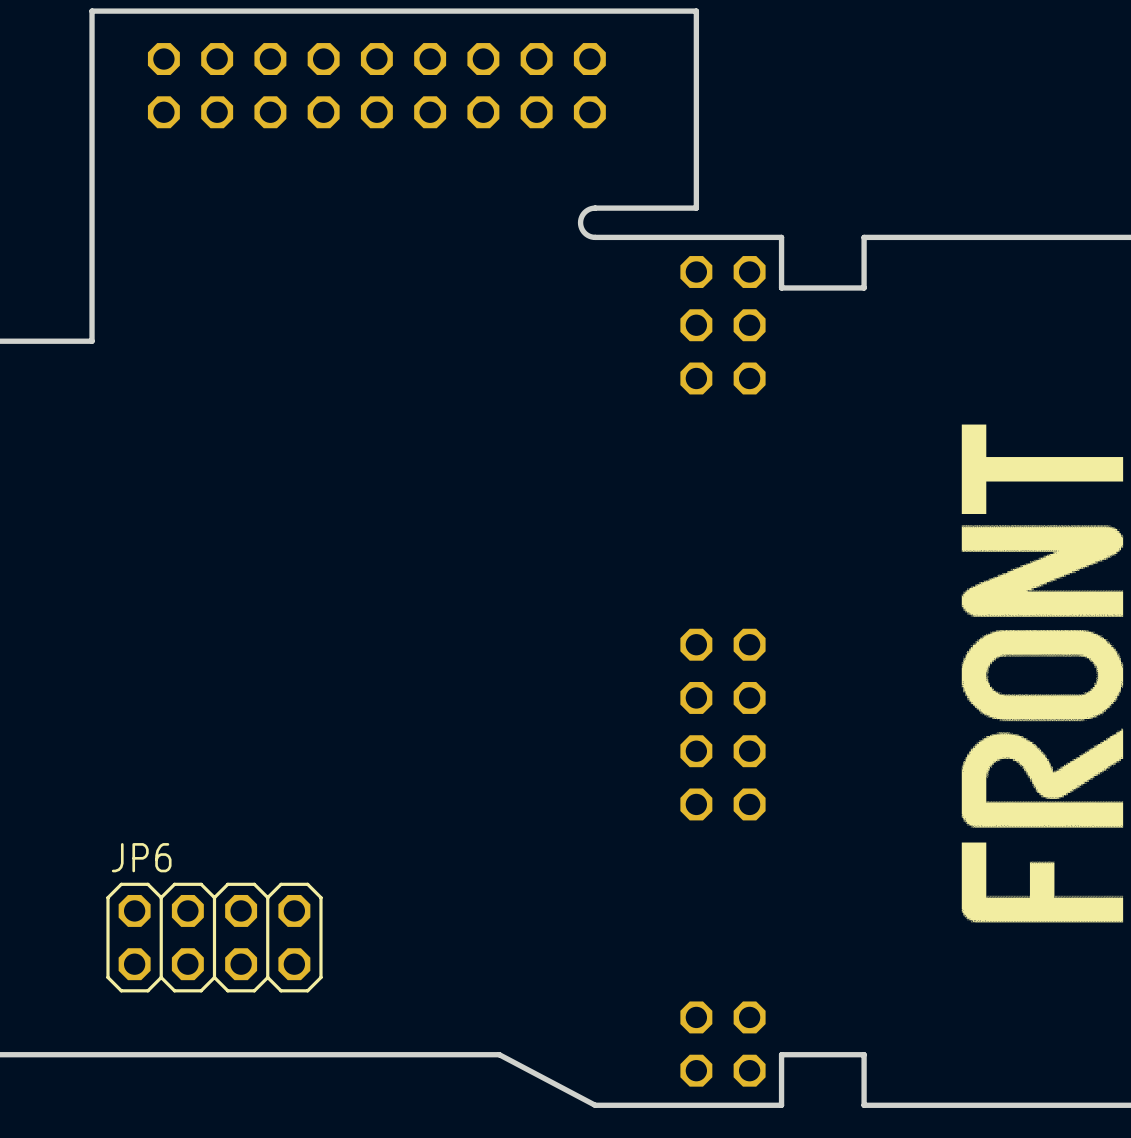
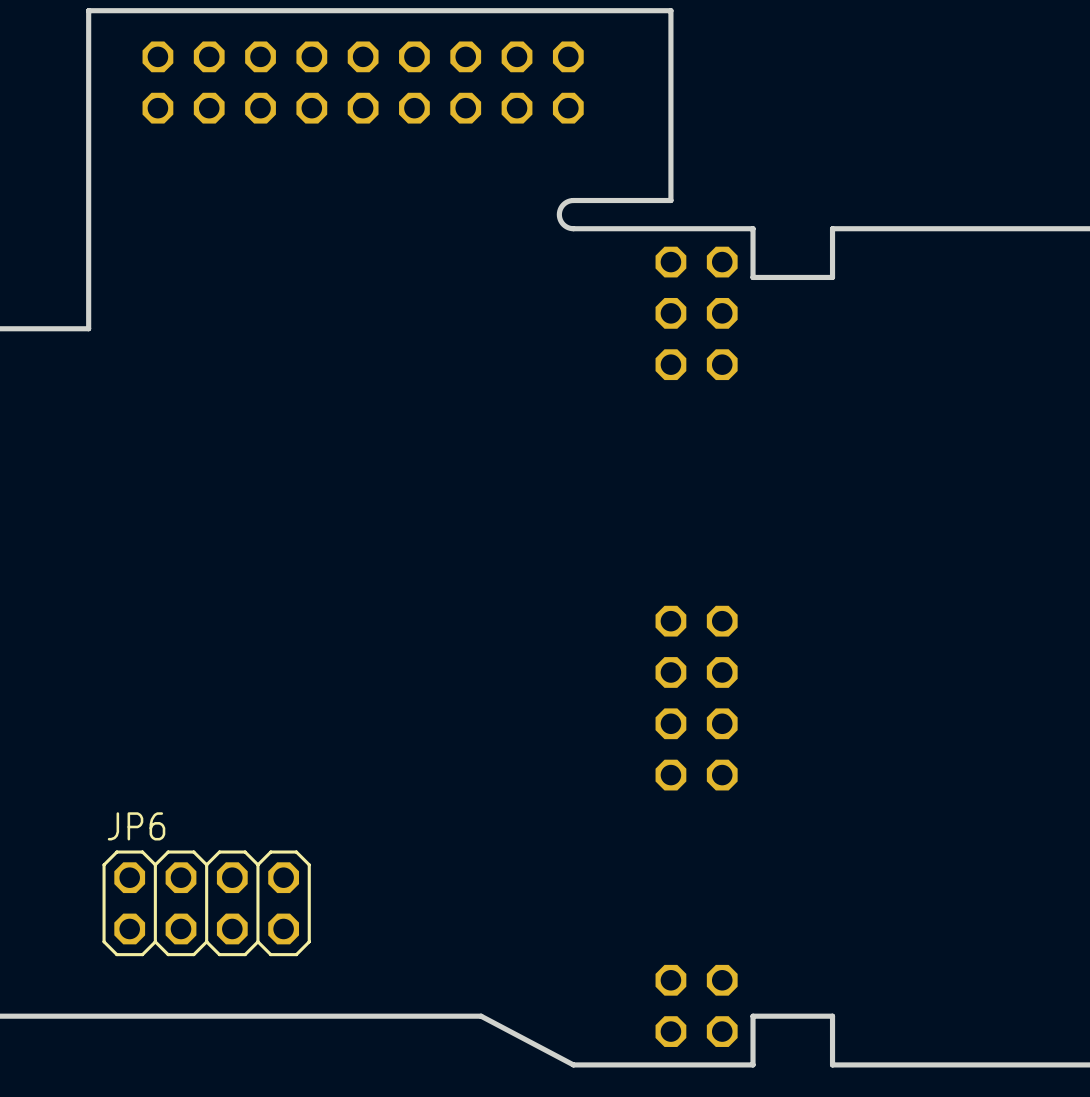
drawing: [961, 424, 1124, 923] -> none

